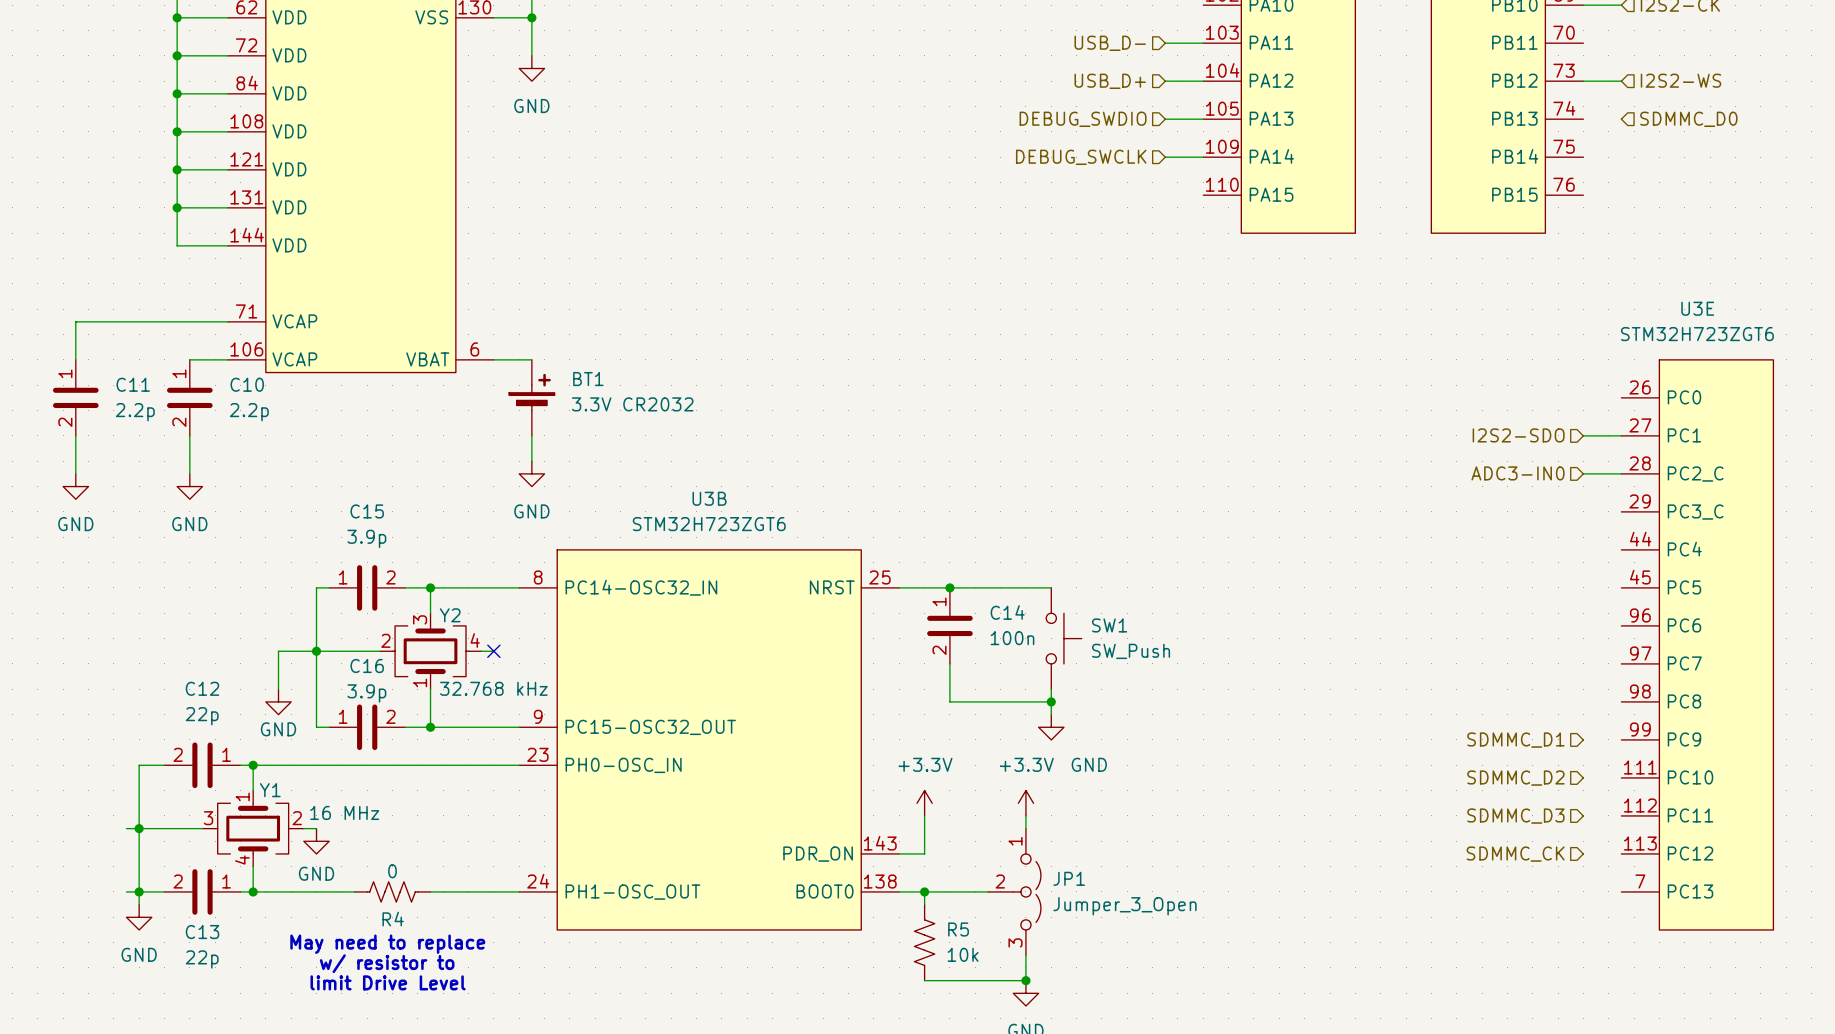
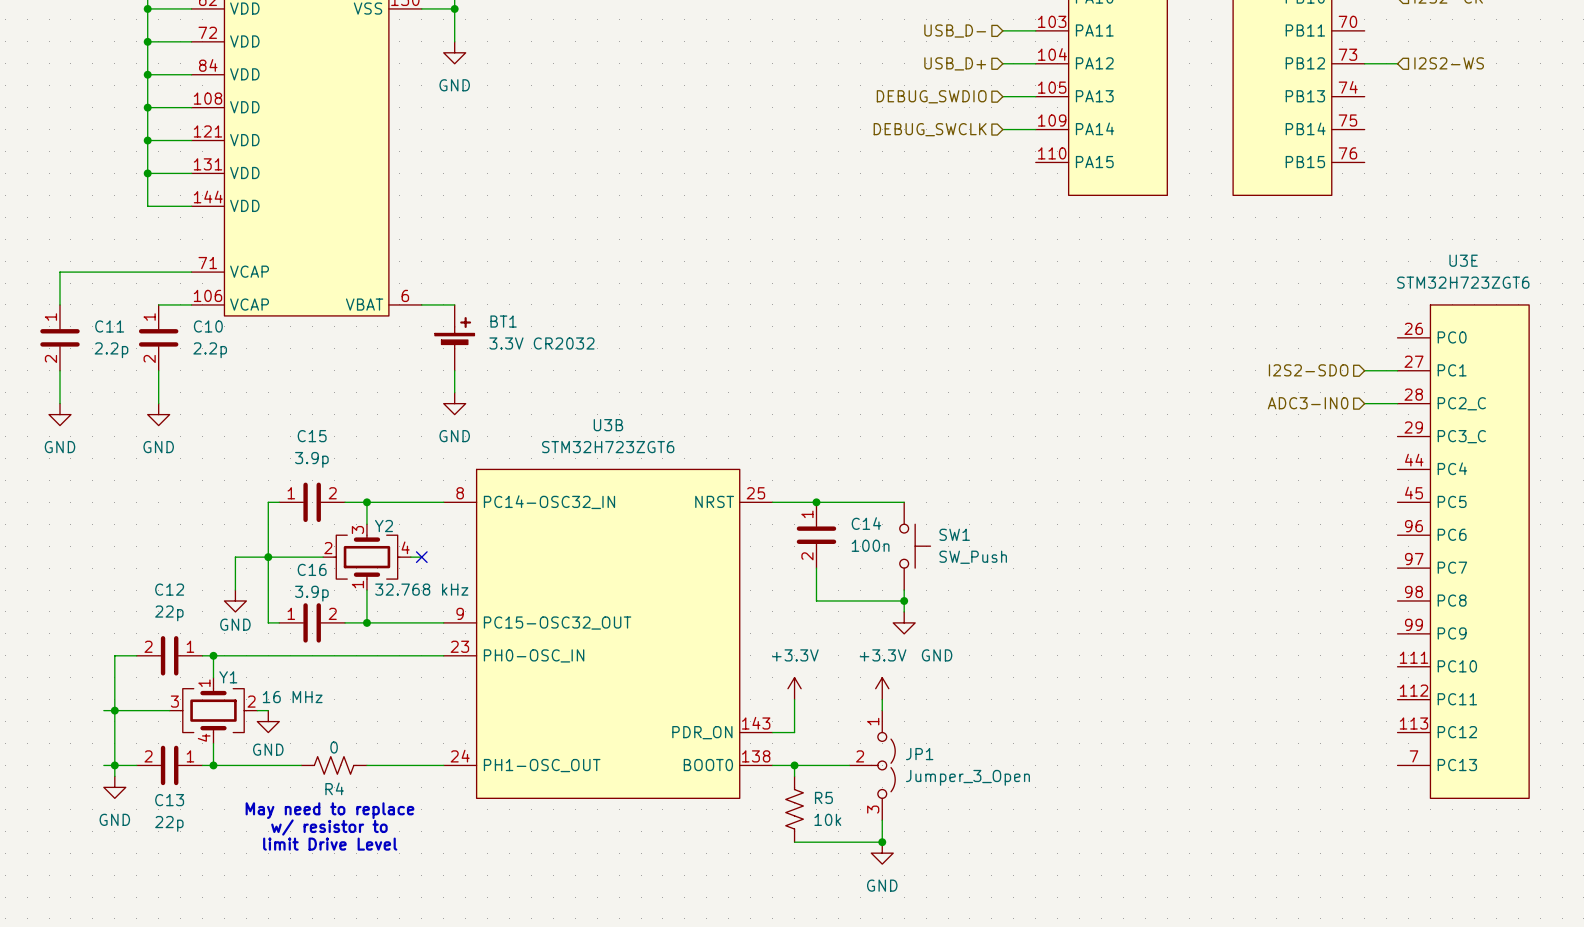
hierarchical label: SDMMC_D0 (1688, 119) -> none
hierarchical label: SDMMC_D1 (1515, 740) -> none
hierarchical label: SDMMC_D2 (1515, 778) -> none
hierarchical label: SDMMC_D3 (1515, 816) -> none
hierarchical label: SDMMC_CK (1515, 854) -> none

